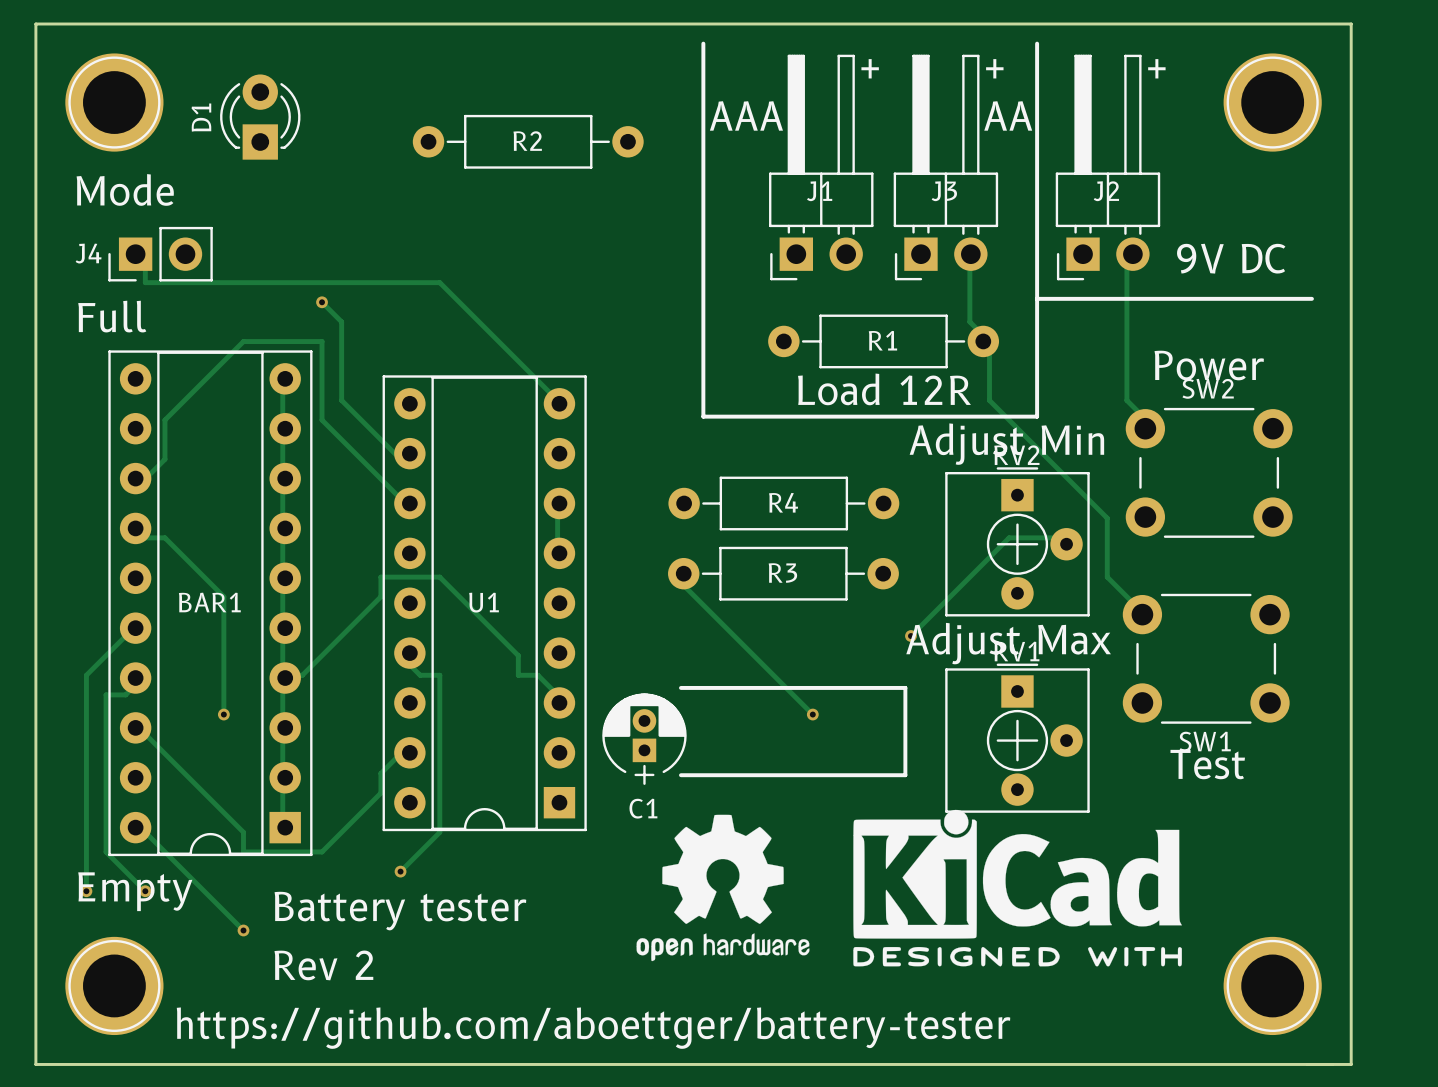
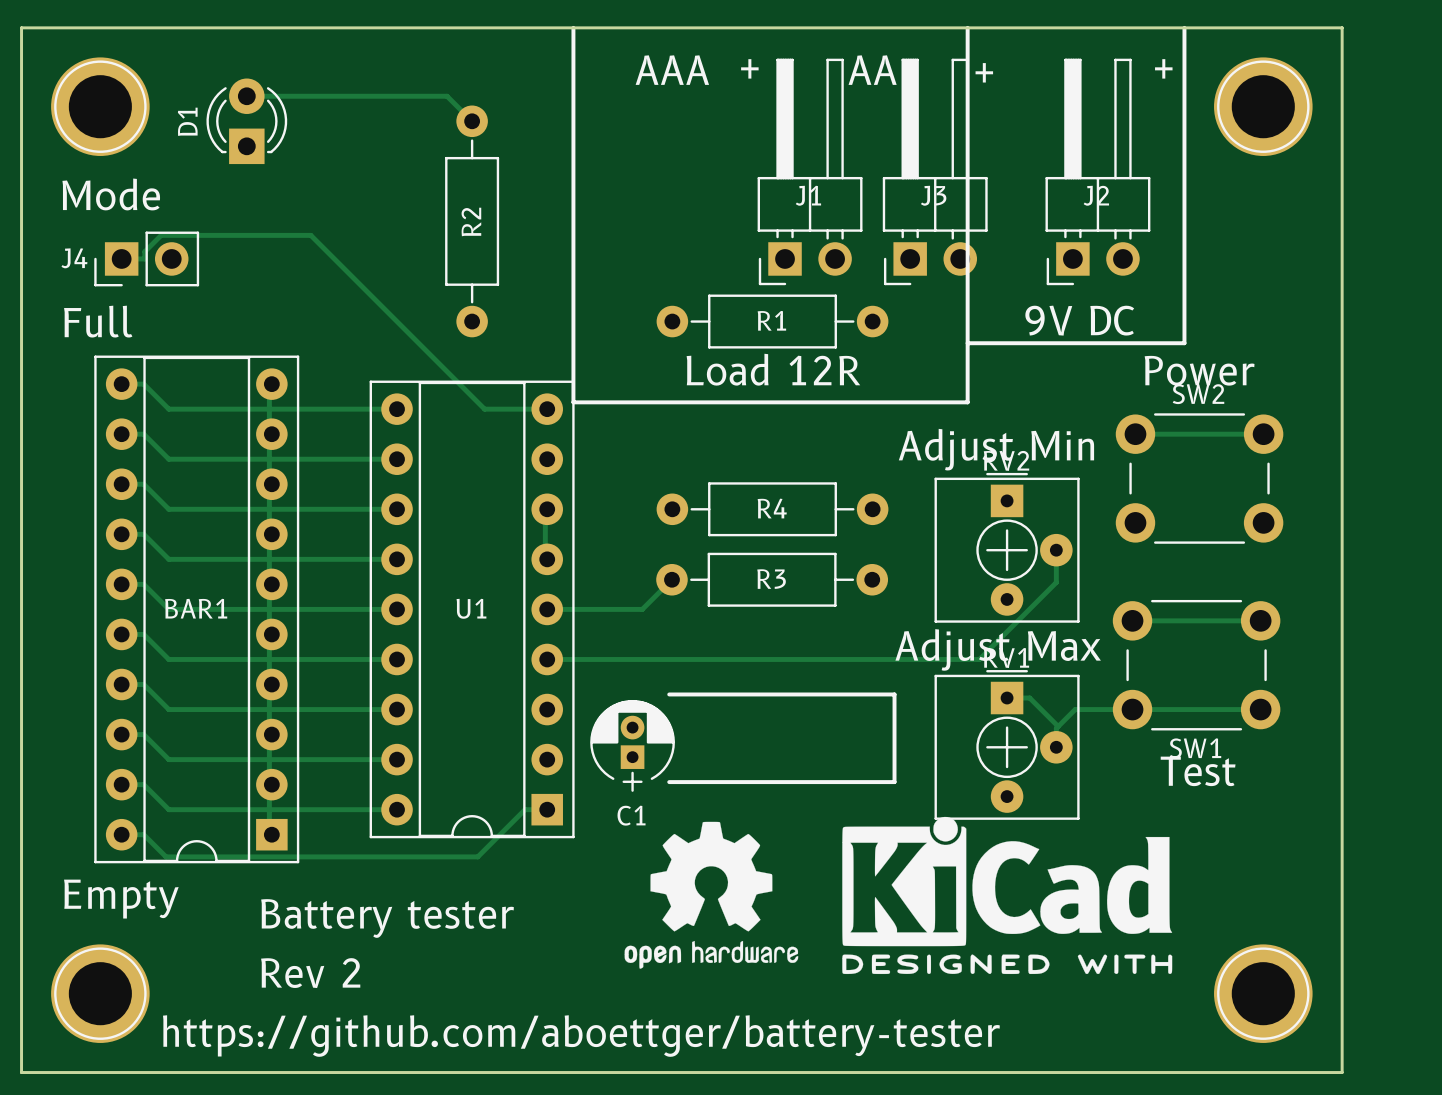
line: none -> (573, 27) (573, 402) (967, 402) (967, 27)
line: none -> (1184, 27) (1184, 343) (967, 343)
line: (703, 43) (703, 416) (1037, 416) (1037, 43) -> none
text position: + (870, 68) -> + (749, 68)
text position: + (1156, 68) -> + (1163, 68)
track: none -> (246, 96) (447, 96) (472, 121)
text position: AAA (746, 115) -> AAA (672, 70)
text position: AA (1008, 115) -> AA (872, 70)
R2 rotation: 0° (528, 141) -> 90° clockwise (472, 221)
track: (135, 254) (145, 263) (145, 282) (439, 282) (559, 403) -> (121, 258) (144, 258) (144, 251) (161, 235) (310, 235) (484, 409) (547, 409)
track: (970, 254) (969, 321) (989, 341) -> none
track: (1132, 254) (1126, 263) (1126, 400) (1146, 420) (1145, 428) -> (1263, 434) (1135, 434)
text position: 9V DC (1231, 258) -> 9V DC (1079, 320)
line: (1037, 298) (1311, 298) -> none
track: (322, 302) (341, 321) (341, 400) (400, 459) (409, 453) -> (121, 434) (143, 434) (168, 459) (397, 459)
via: (322, 302) -> none
R1 position: (883, 341) -> (772, 321)
track: (989, 341) (989, 400) (1107, 518) (1107, 577) (1146, 616) (1142, 614) -> (1260, 620) (1132, 620)
track: none -> (121, 384) (143, 384) (168, 409) (397, 409)
text position: Load 12R (884, 389) -> Load 12R (773, 369)
track: (135, 478) (145, 478) (164, 459) (164, 420) (243, 341) (322, 341) (322, 420) (400, 498) (409, 503) -> (121, 484) (143, 484) (168, 509) (397, 509)
track: (135, 528) (145, 537) (164, 537) (223, 596) (223, 714) -> (121, 534) (143, 534) (168, 559) (397, 559)
track: (1066, 544) (1068, 537) (1009, 537) (910, 636) -> (1056, 550) (1056, 582) (979, 659) (547, 659)
track: (683, 573) (675, 577) (812, 714) -> (671, 579) (642, 609) (547, 609)
track: none -> (121, 584) (143, 584) (168, 609) (397, 609)
track: (135, 628) (145, 636) (125, 636) (86, 675) (86, 891) -> none
via: (910, 636) -> none
track: (409, 653) (400, 655) (420, 675) (439, 675) (439, 832) (400, 871) -> (397, 659) (168, 659) (143, 634) (121, 634)
track: (135, 678) (145, 675) (125, 694) (106, 694) (106, 851) (145, 891) -> (121, 684) (143, 684) (168, 709) (397, 709)
track: (285, 678) (282, 675) (302, 675) (380, 596) (380, 577) (439, 577) (518, 655) (518, 675) (537, 675) (557, 694) (559, 702) -> none
track: none -> (1007, 698) (1029, 698) (1058, 726)
track: none -> (1260, 709) (1075, 709) (1056, 728) (1056, 747)
via: (223, 714) -> none
via: (812, 714) -> none
track: (135, 727) (145, 734) (243, 832) (243, 851) (322, 851) (380, 793) (380, 773) (400, 753) (409, 752) -> (121, 734) (143, 734) (168, 759) (397, 759)
track: none -> (121, 784) (143, 784) (168, 809) (397, 809)
track: (135, 827) (145, 832) (243, 930) -> (121, 834) (143, 834) (166, 856) (477, 856) (525, 809) (547, 809)
via: (400, 871) -> none
via: (86, 891) -> none
via: (145, 891) -> none
via: (243, 930) -> none

